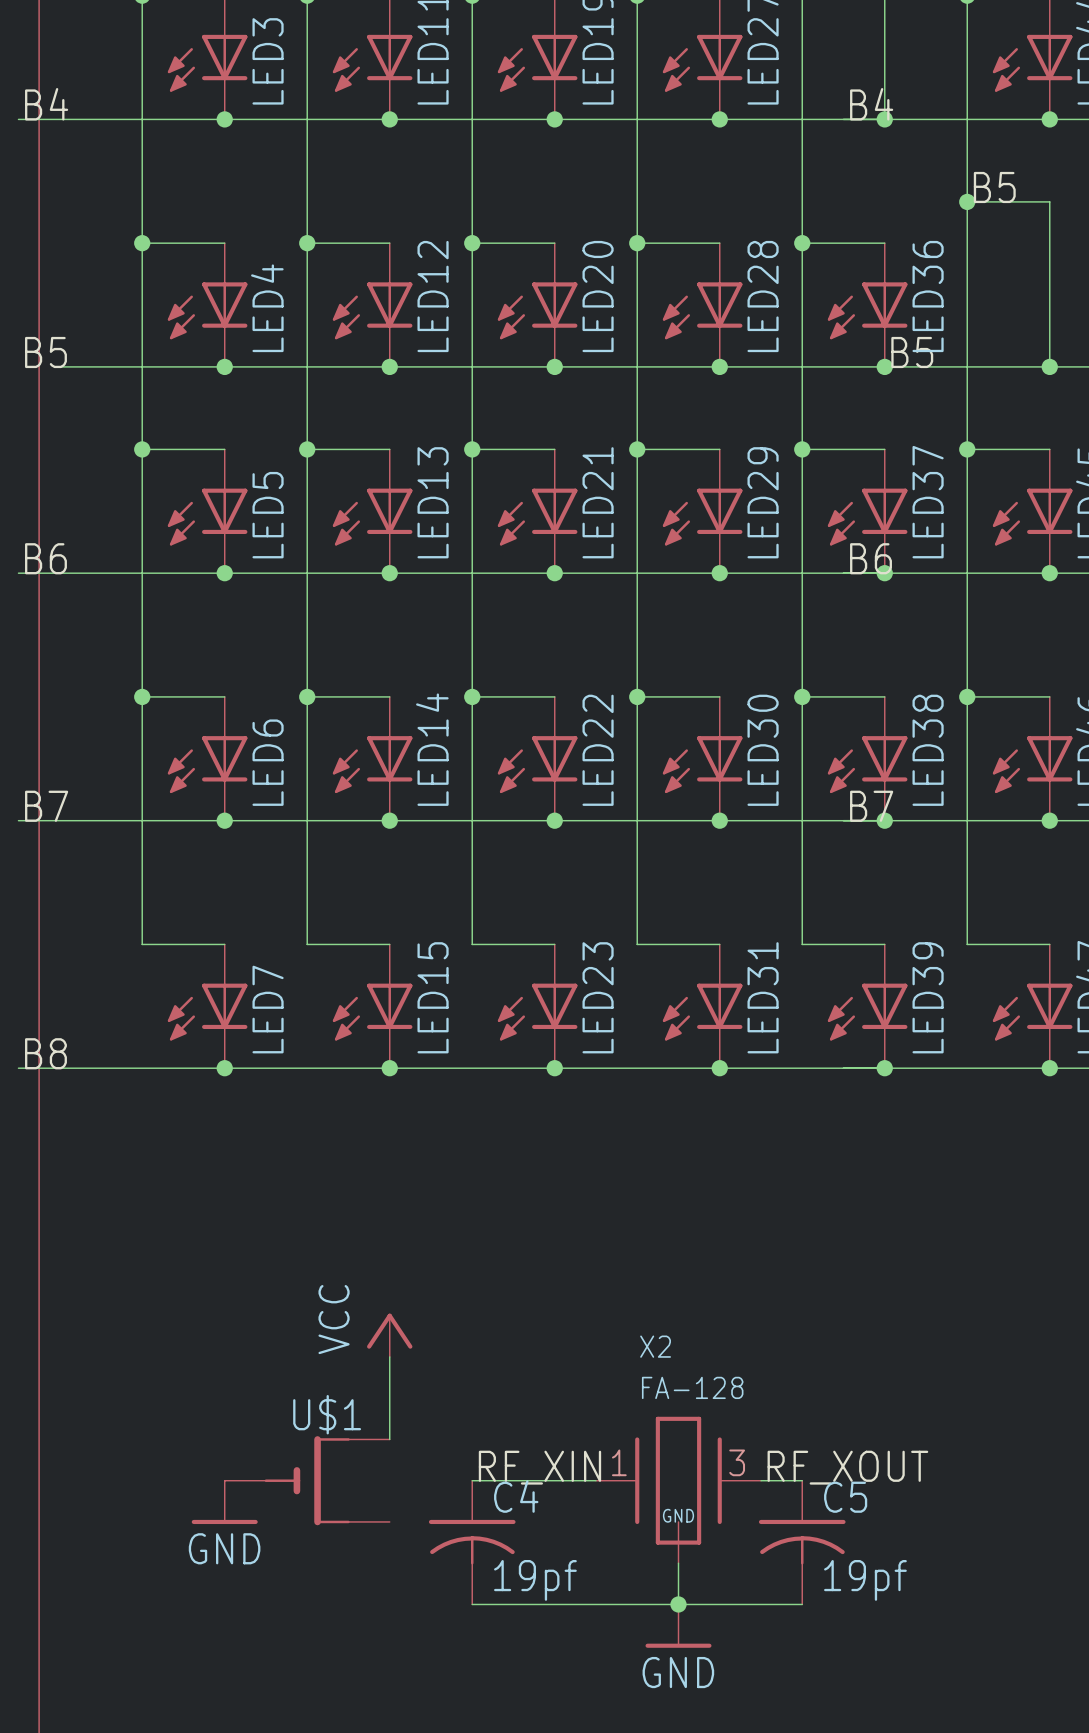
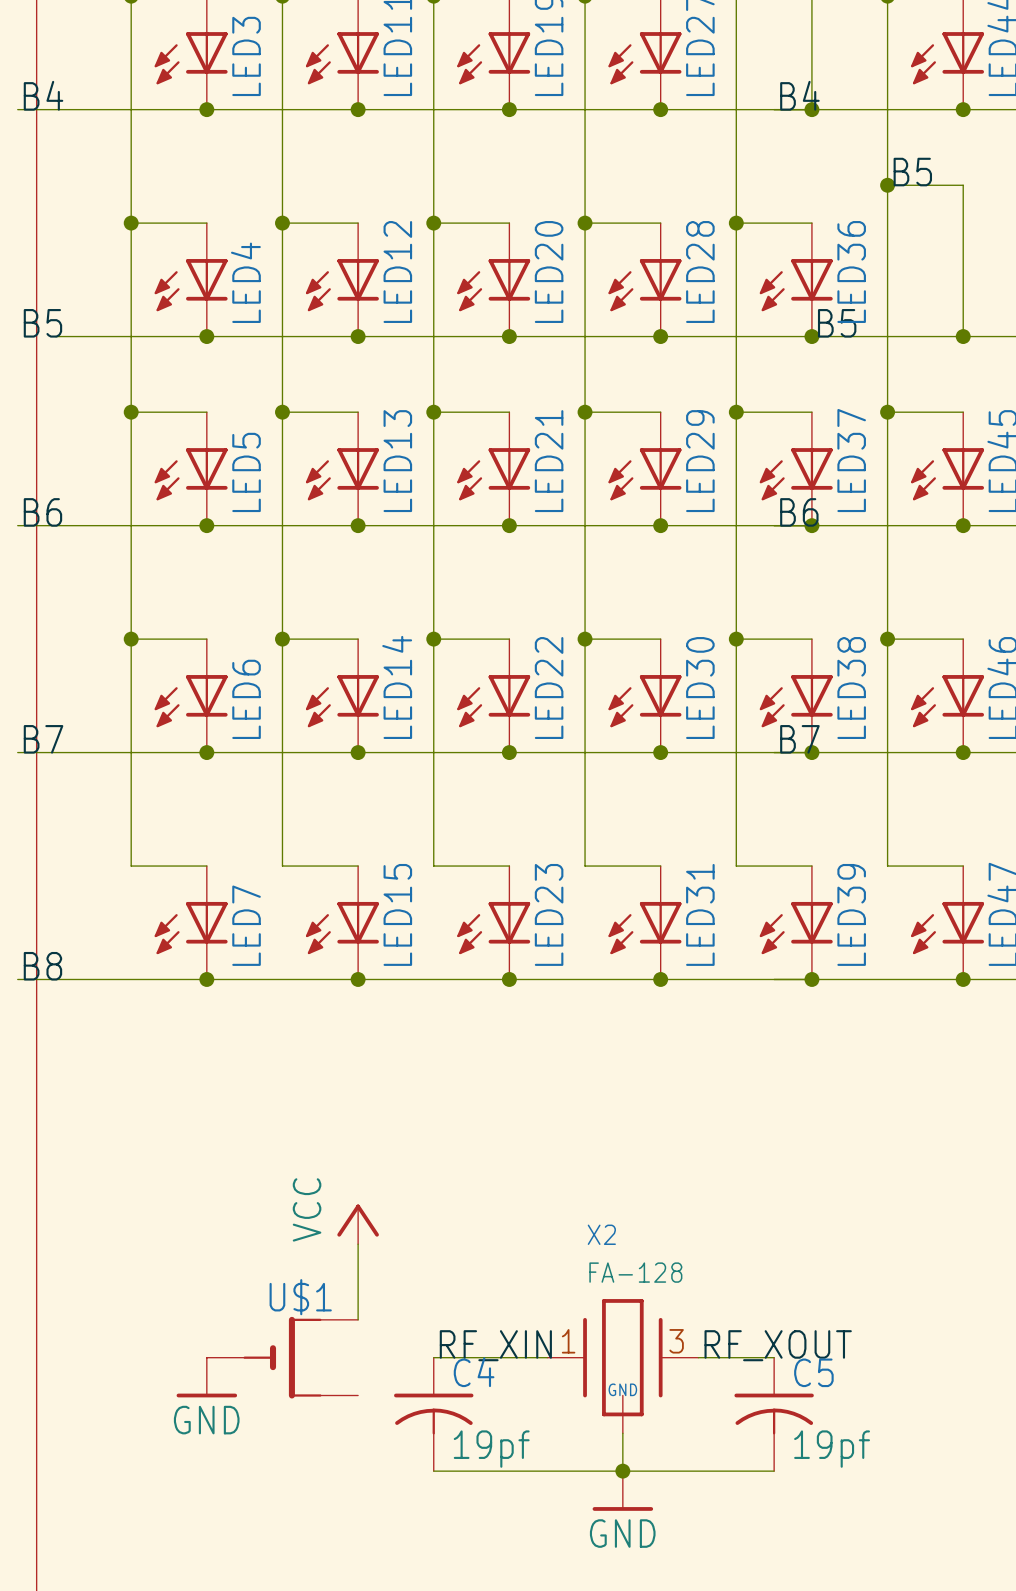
wire: none -> (736, 1357) (774, 1357)
C5 position: (802, 1542) -> (774, 1414)
wire: none -> (736, 1471) (774, 1471)

